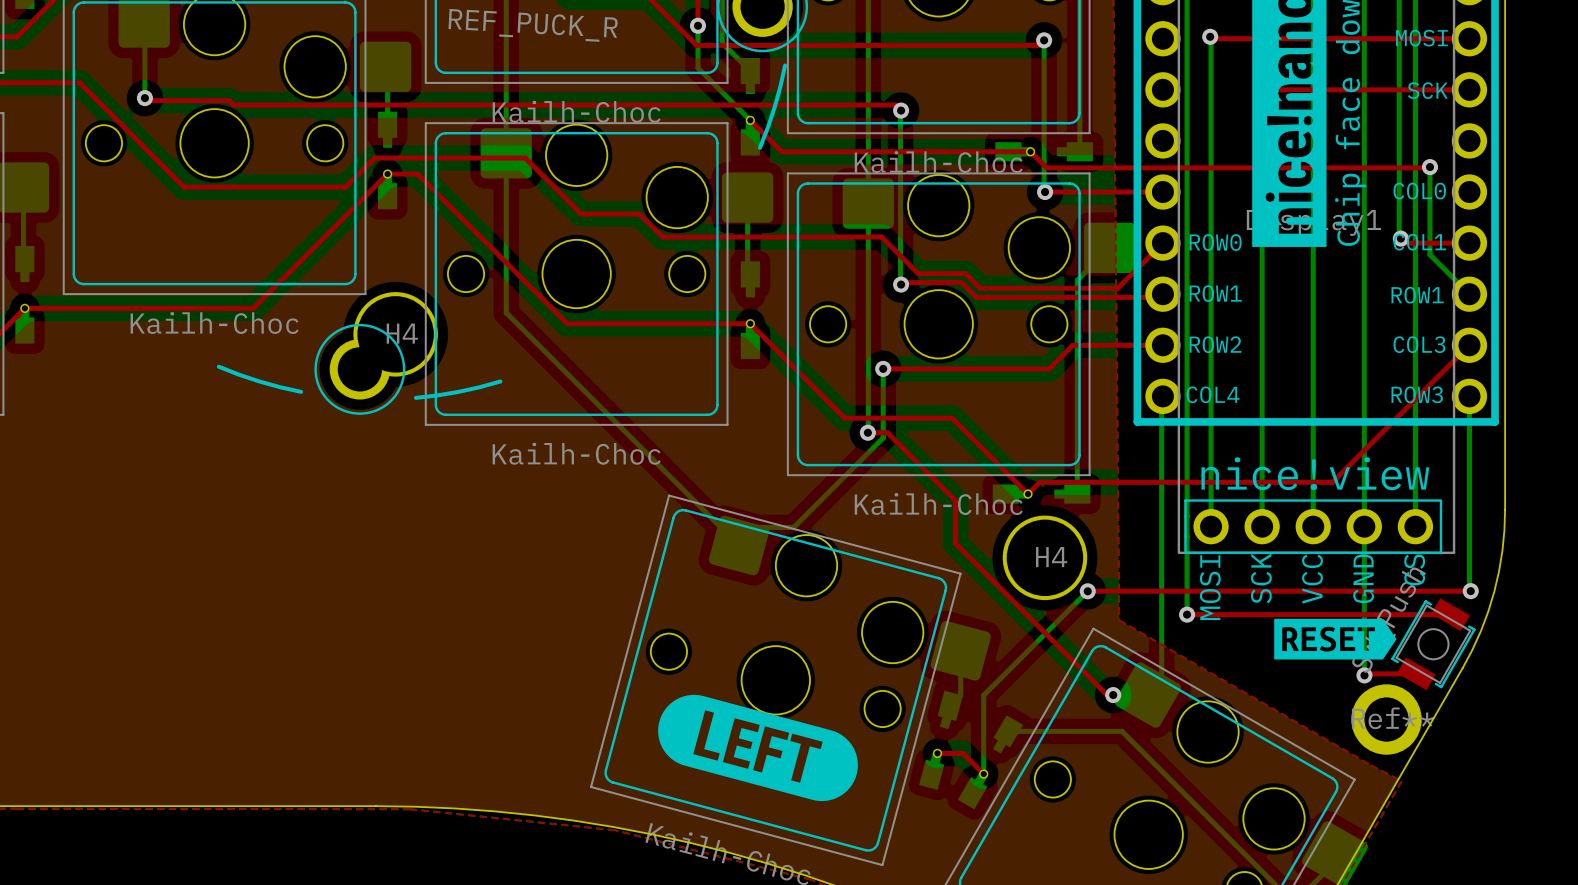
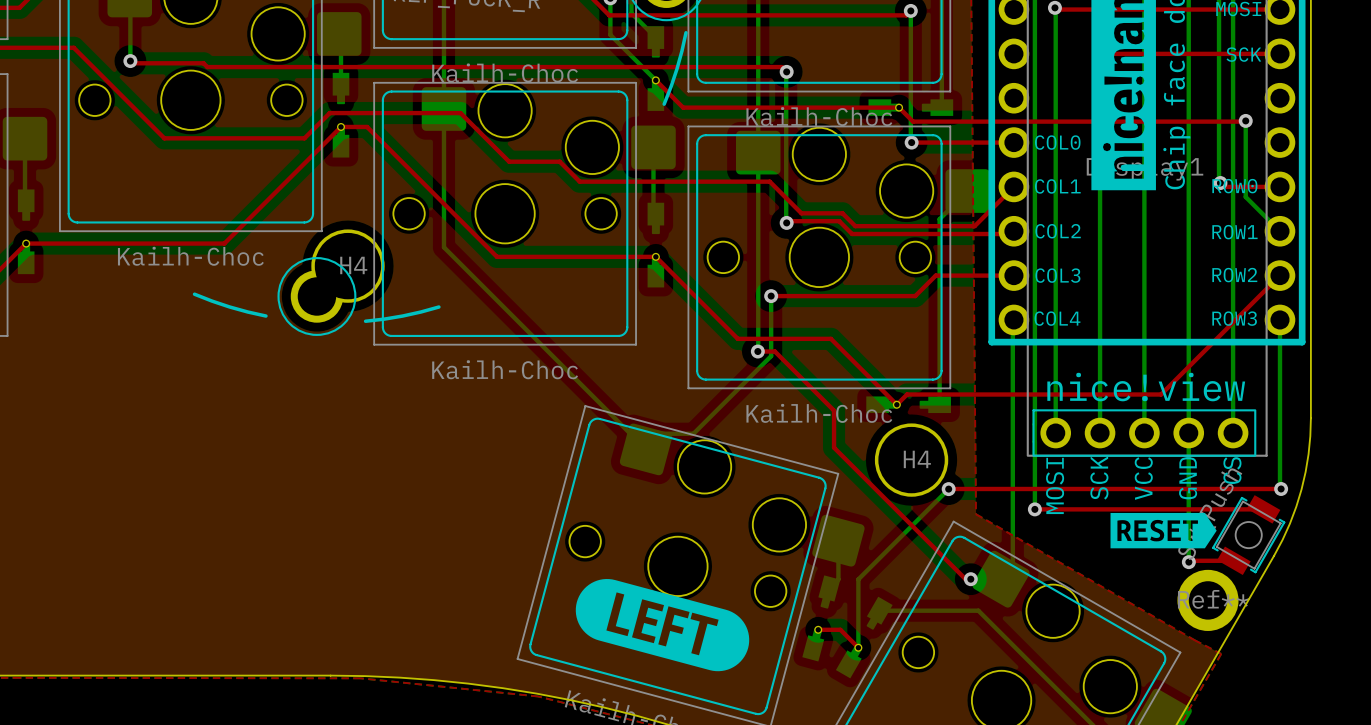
part text position: COL0 (1419, 191) -> COL0 (1057, 142)
part text position: ROW0 (1215, 242) -> ROW0 (1234, 186)
part text position: COL1 (1419, 242) -> COL1 (1057, 186)
part text: ROW1 (1215, 293) -> none
part text: none -> COL2 (1058, 231)
part text position: ROW2 (1215, 344) -> ROW2 (1234, 275)
part text position: COL3 (1419, 344) -> COL3 (1057, 275)

